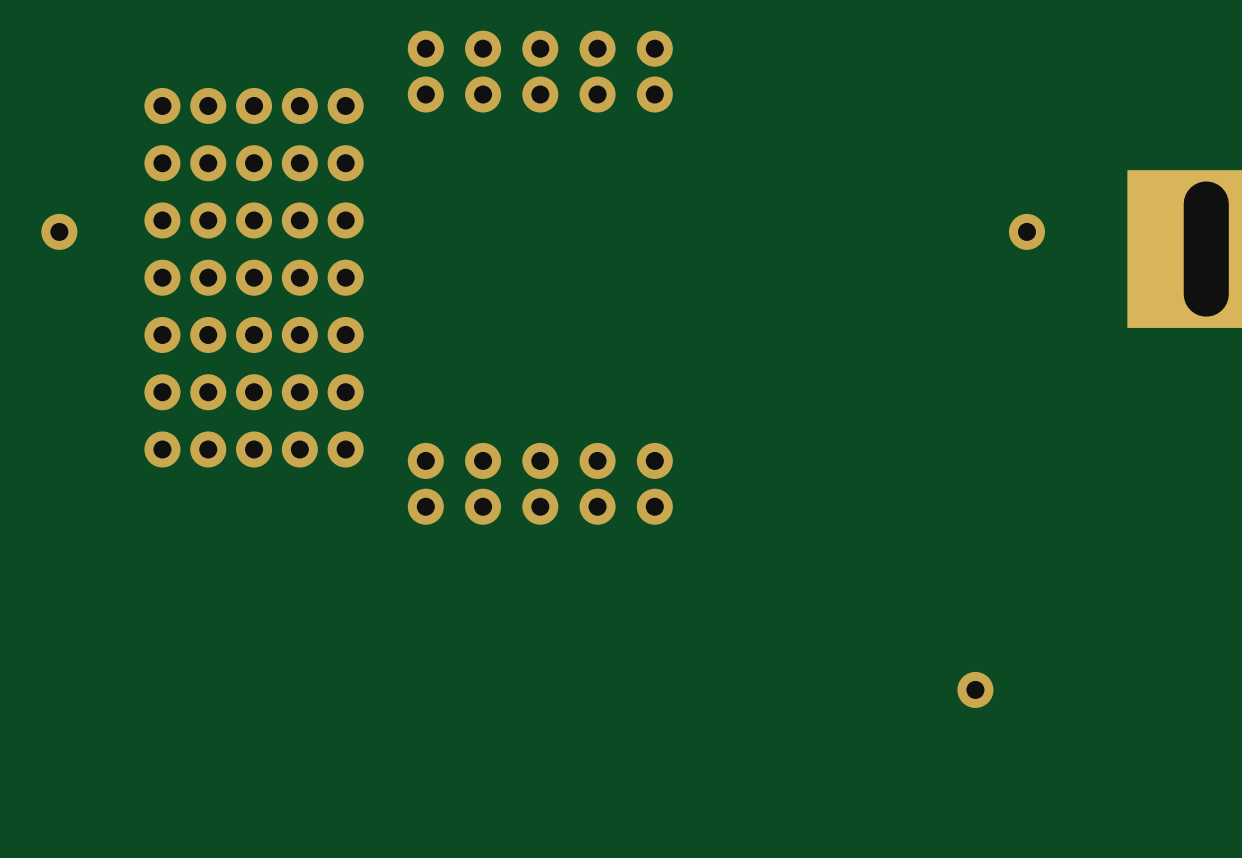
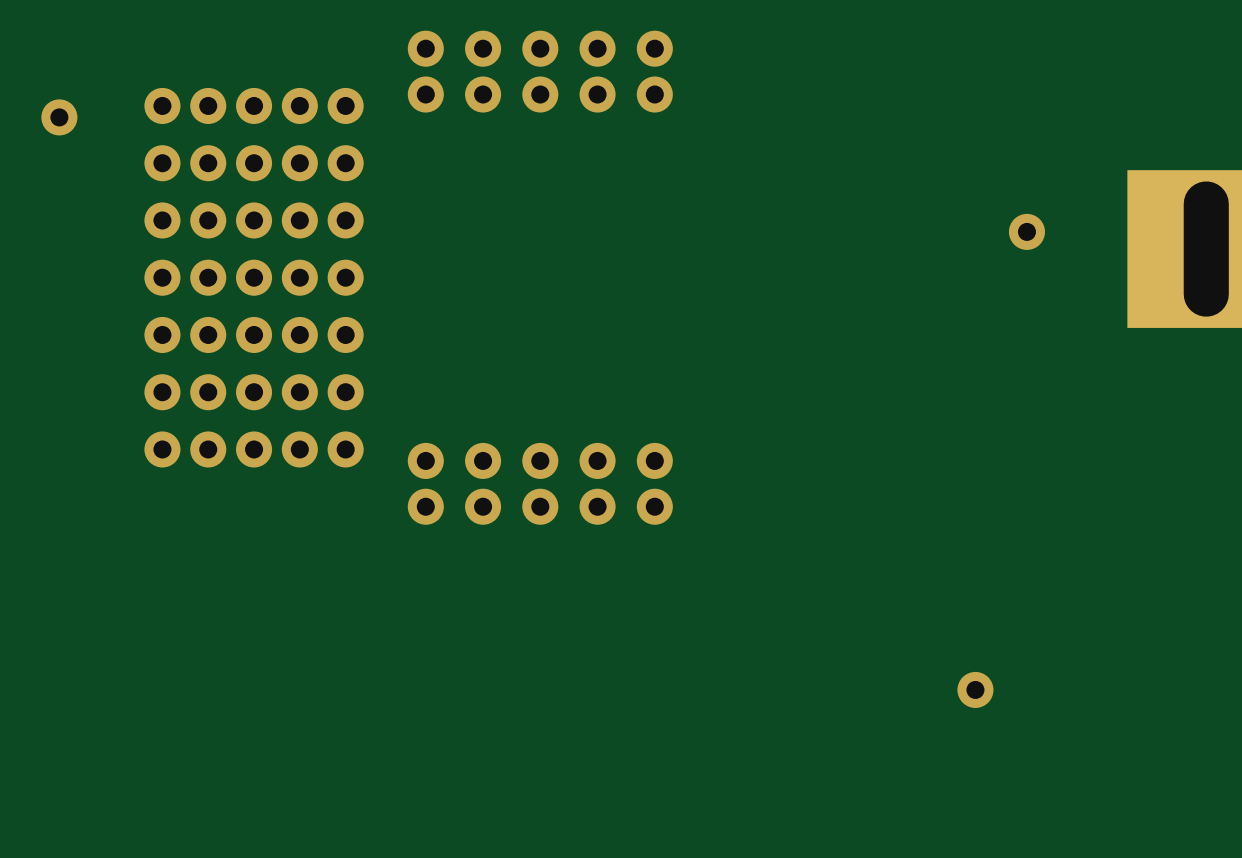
via: none -> (59, 117)
via: (59, 231) -> none

